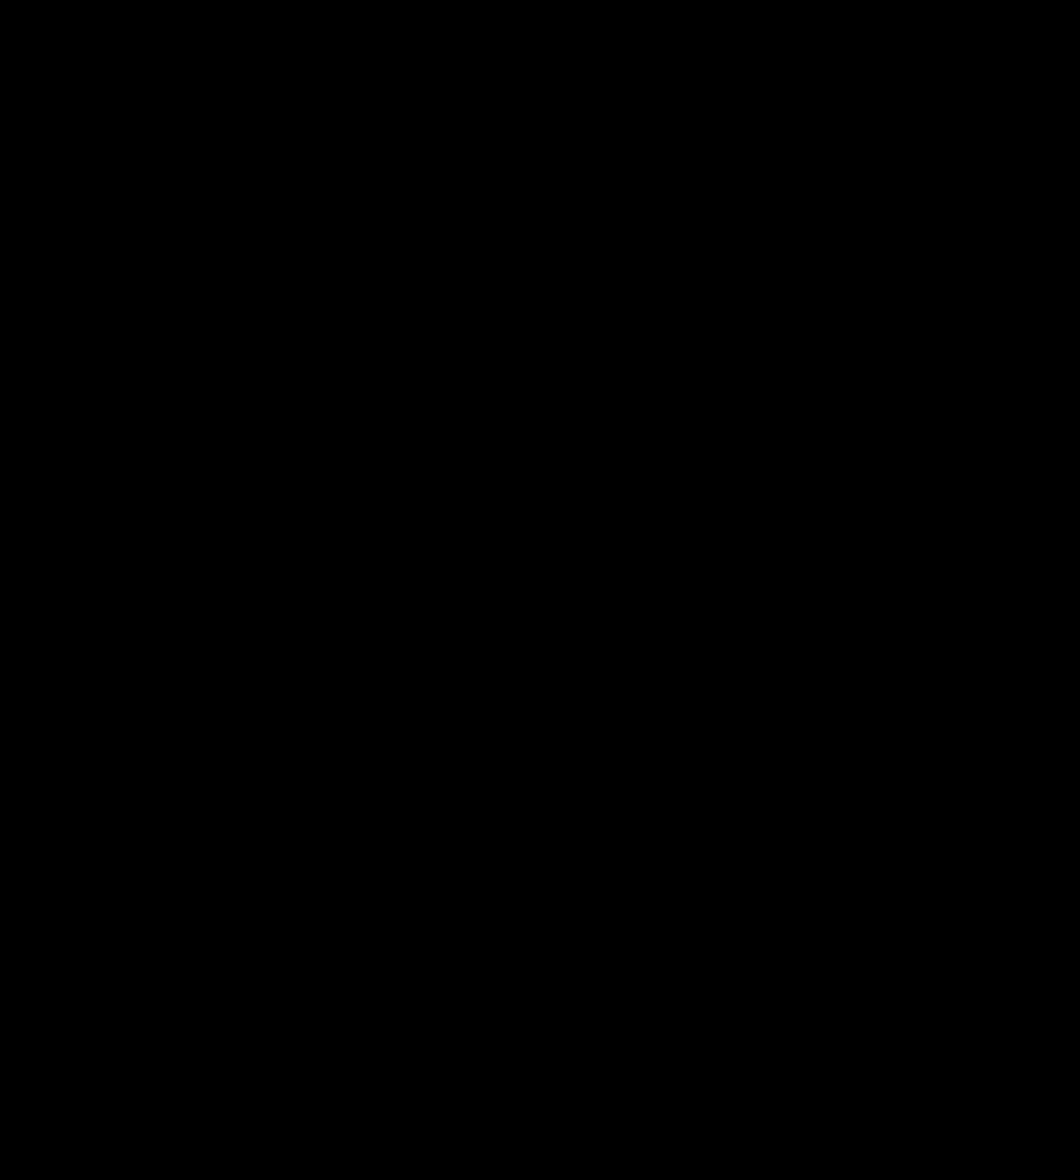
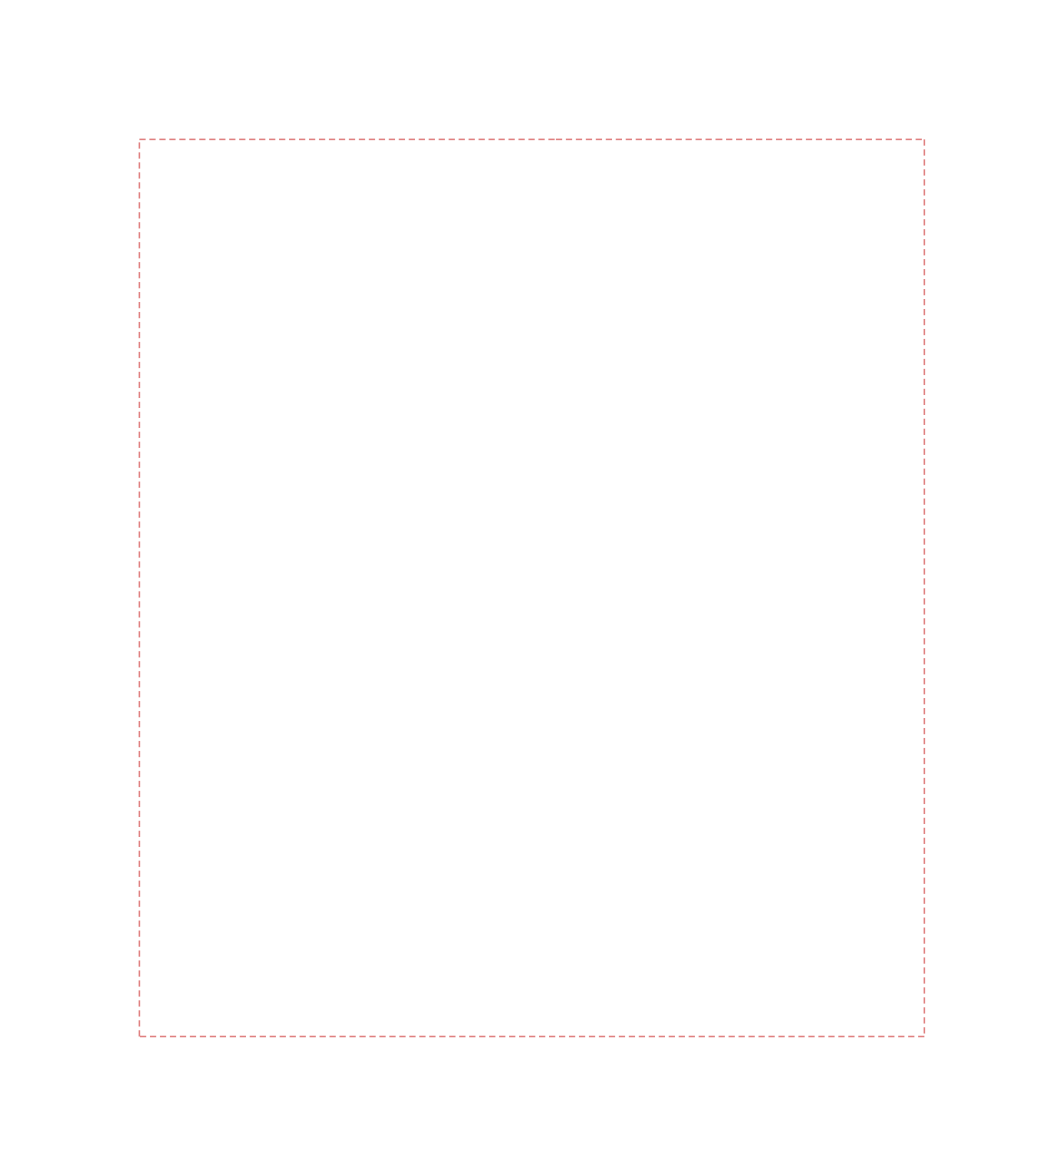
top zone outline: none -> (139, 139) (924, 139) (924, 1036) (139, 1036) (139, 139)

